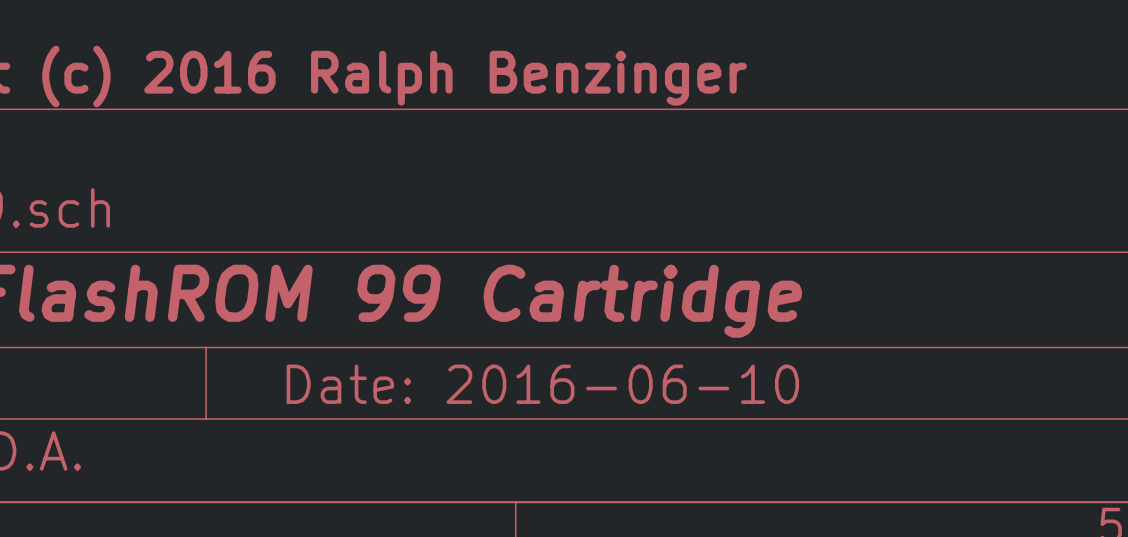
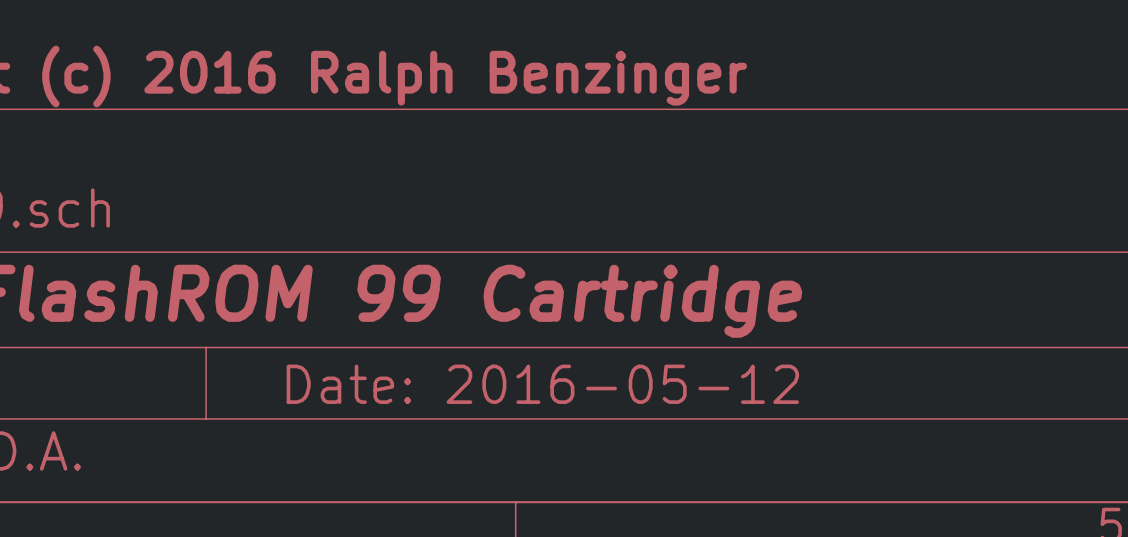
title block: Date: 2016-06-10 (542, 384) -> Date: 2016-05-12 (542, 384)

